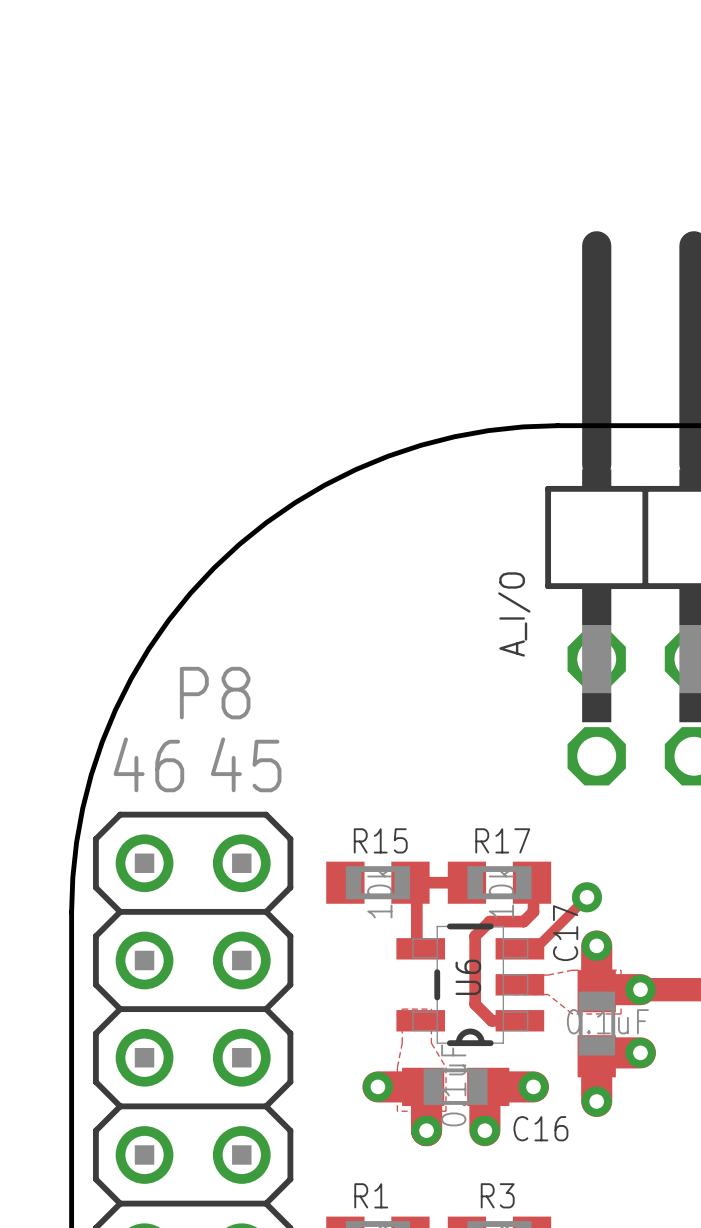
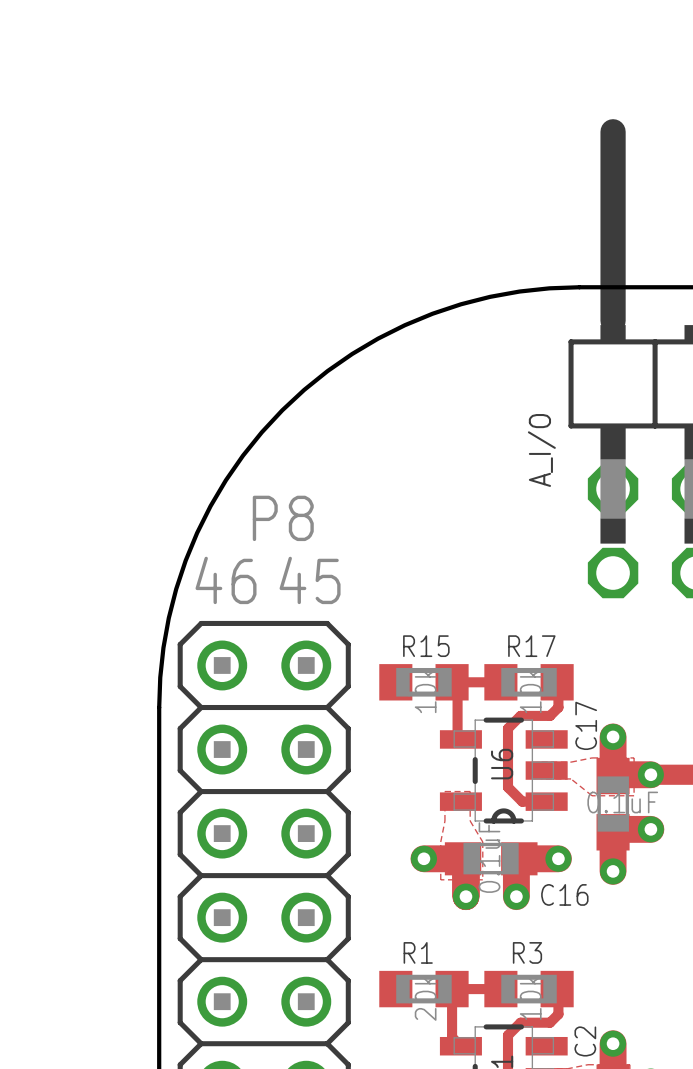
track: (586, 897) (535, 948) (519, 948) -> none
via: (586, 897) -> none

